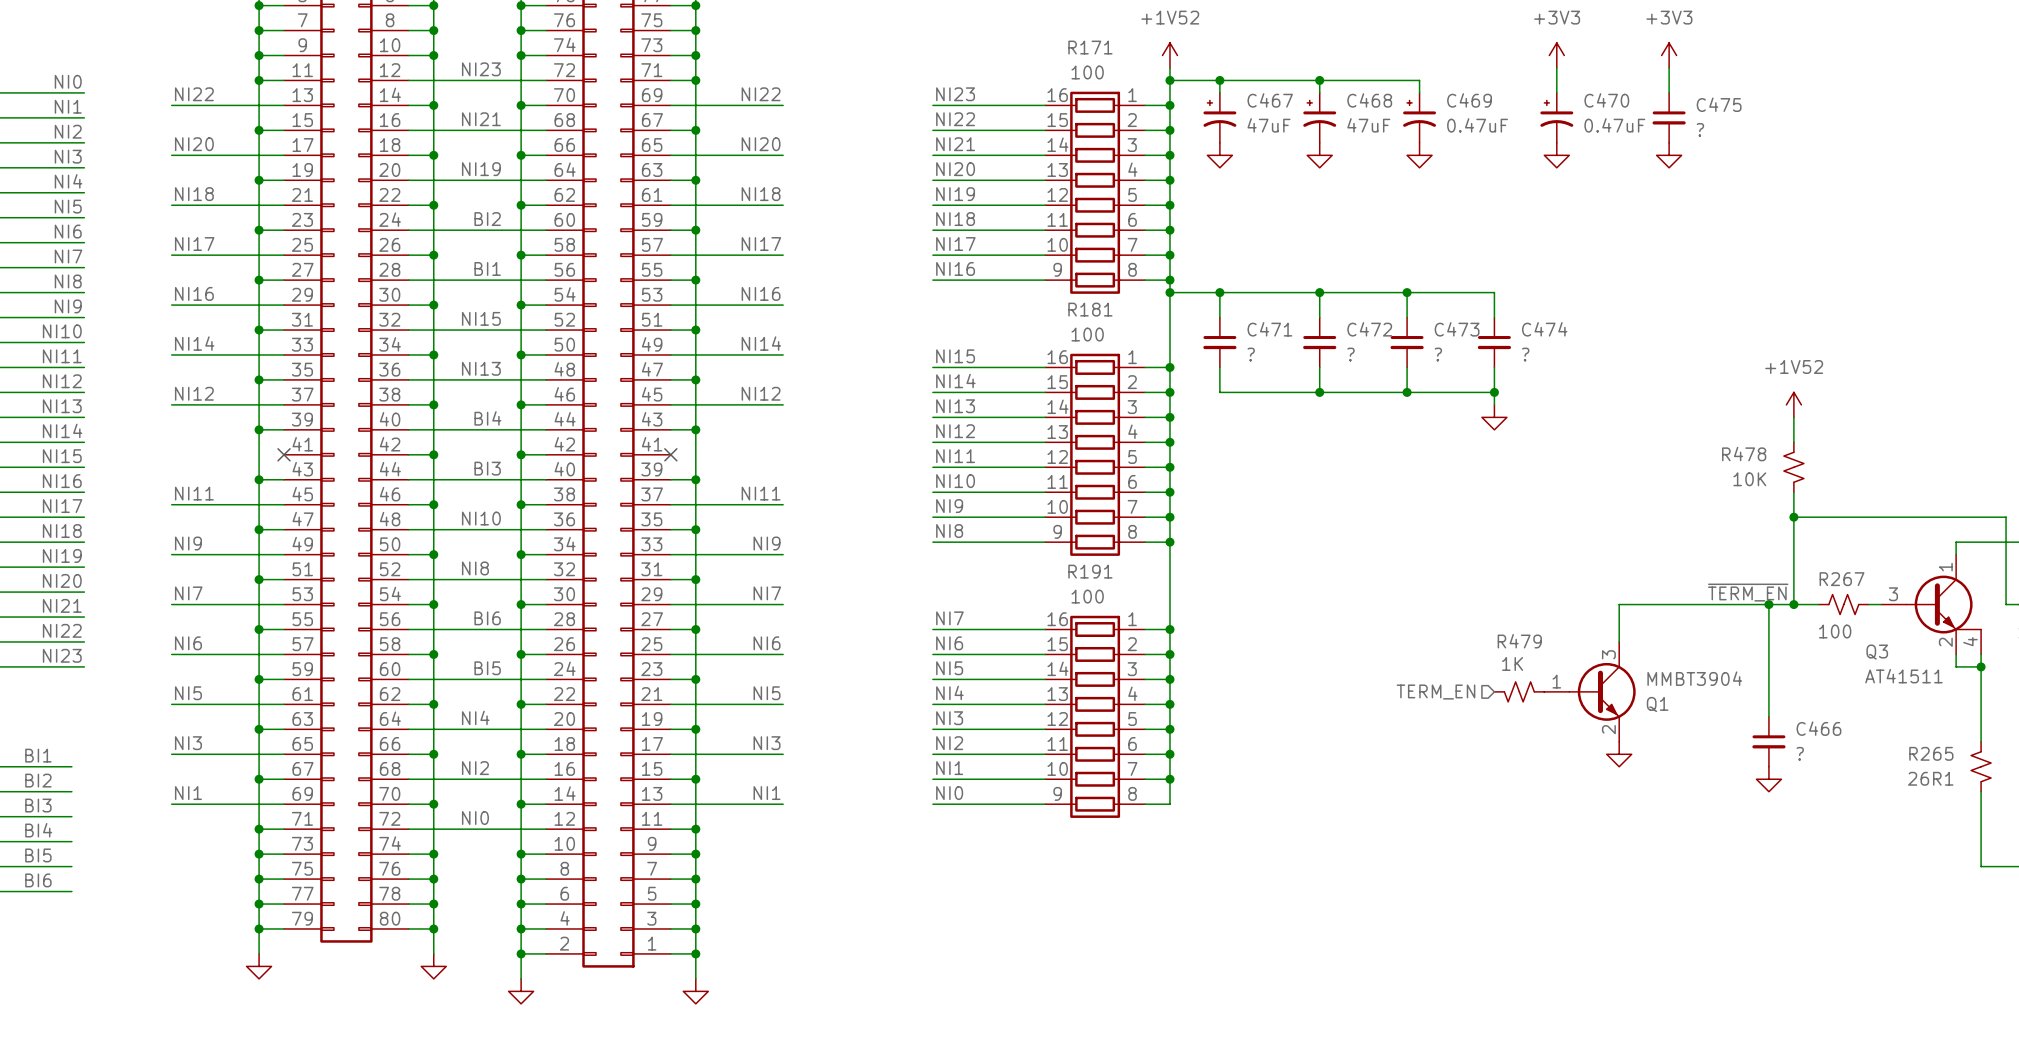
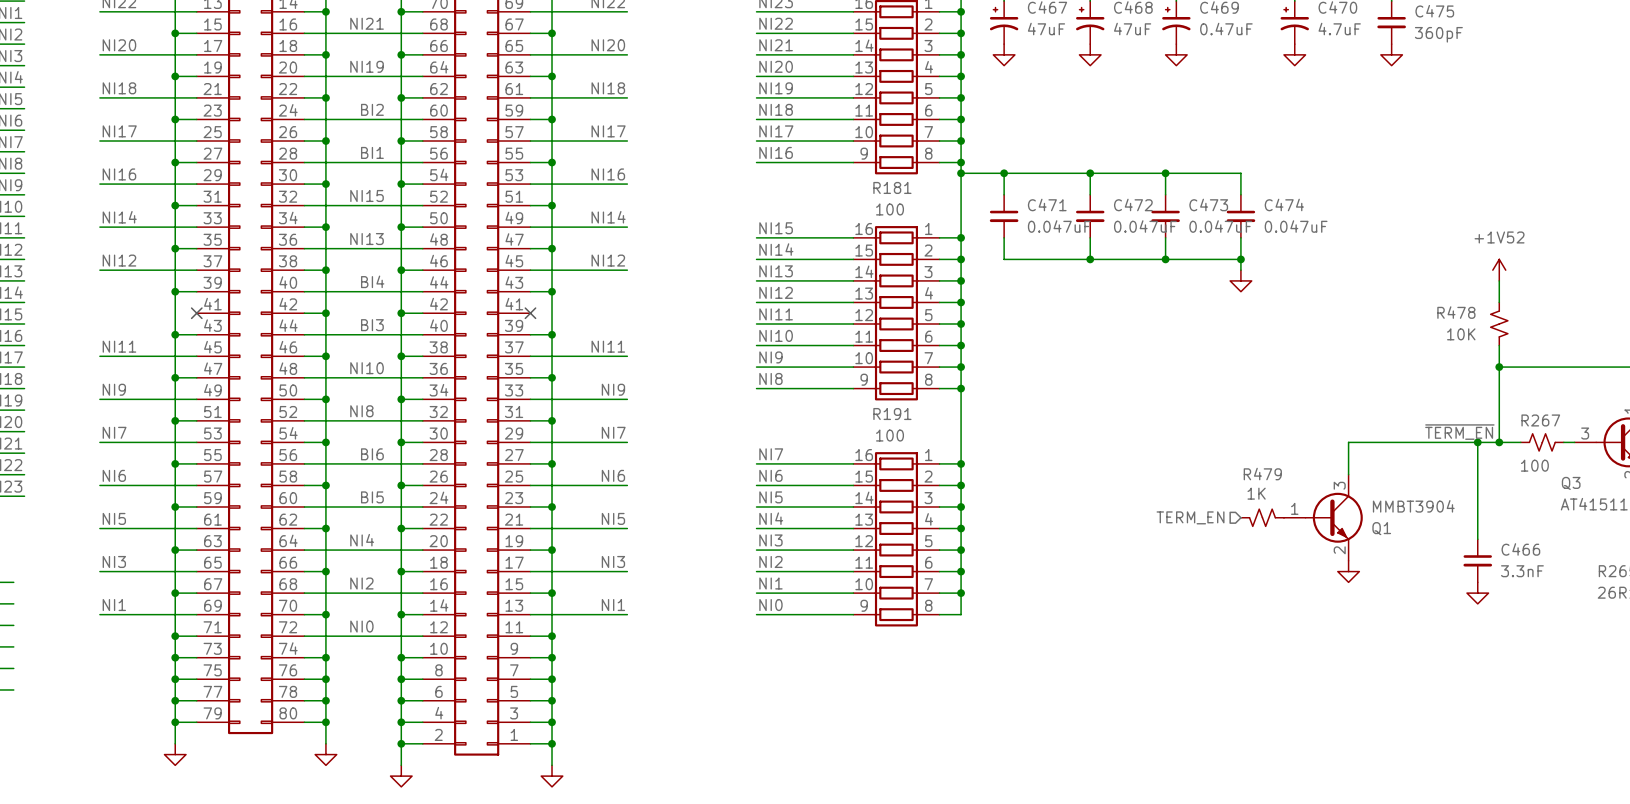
C470 value: 0.47uF (1614, 125) -> 4.7uF (1339, 29)
C475 value: ? (1700, 129) -> 360pF (1438, 34)
C471 value: ? (1251, 354) -> 0.047uF (1059, 226)
C472 value: ? (1351, 354) -> 0.047uF (1145, 226)
C473 value: ? (1438, 354) -> 0.047uF (1220, 226)
C474 value: ? (1525, 354) -> 0.047uF (1296, 226)
C466 value: ? (1800, 753) -> 3.3nF (1522, 571)

